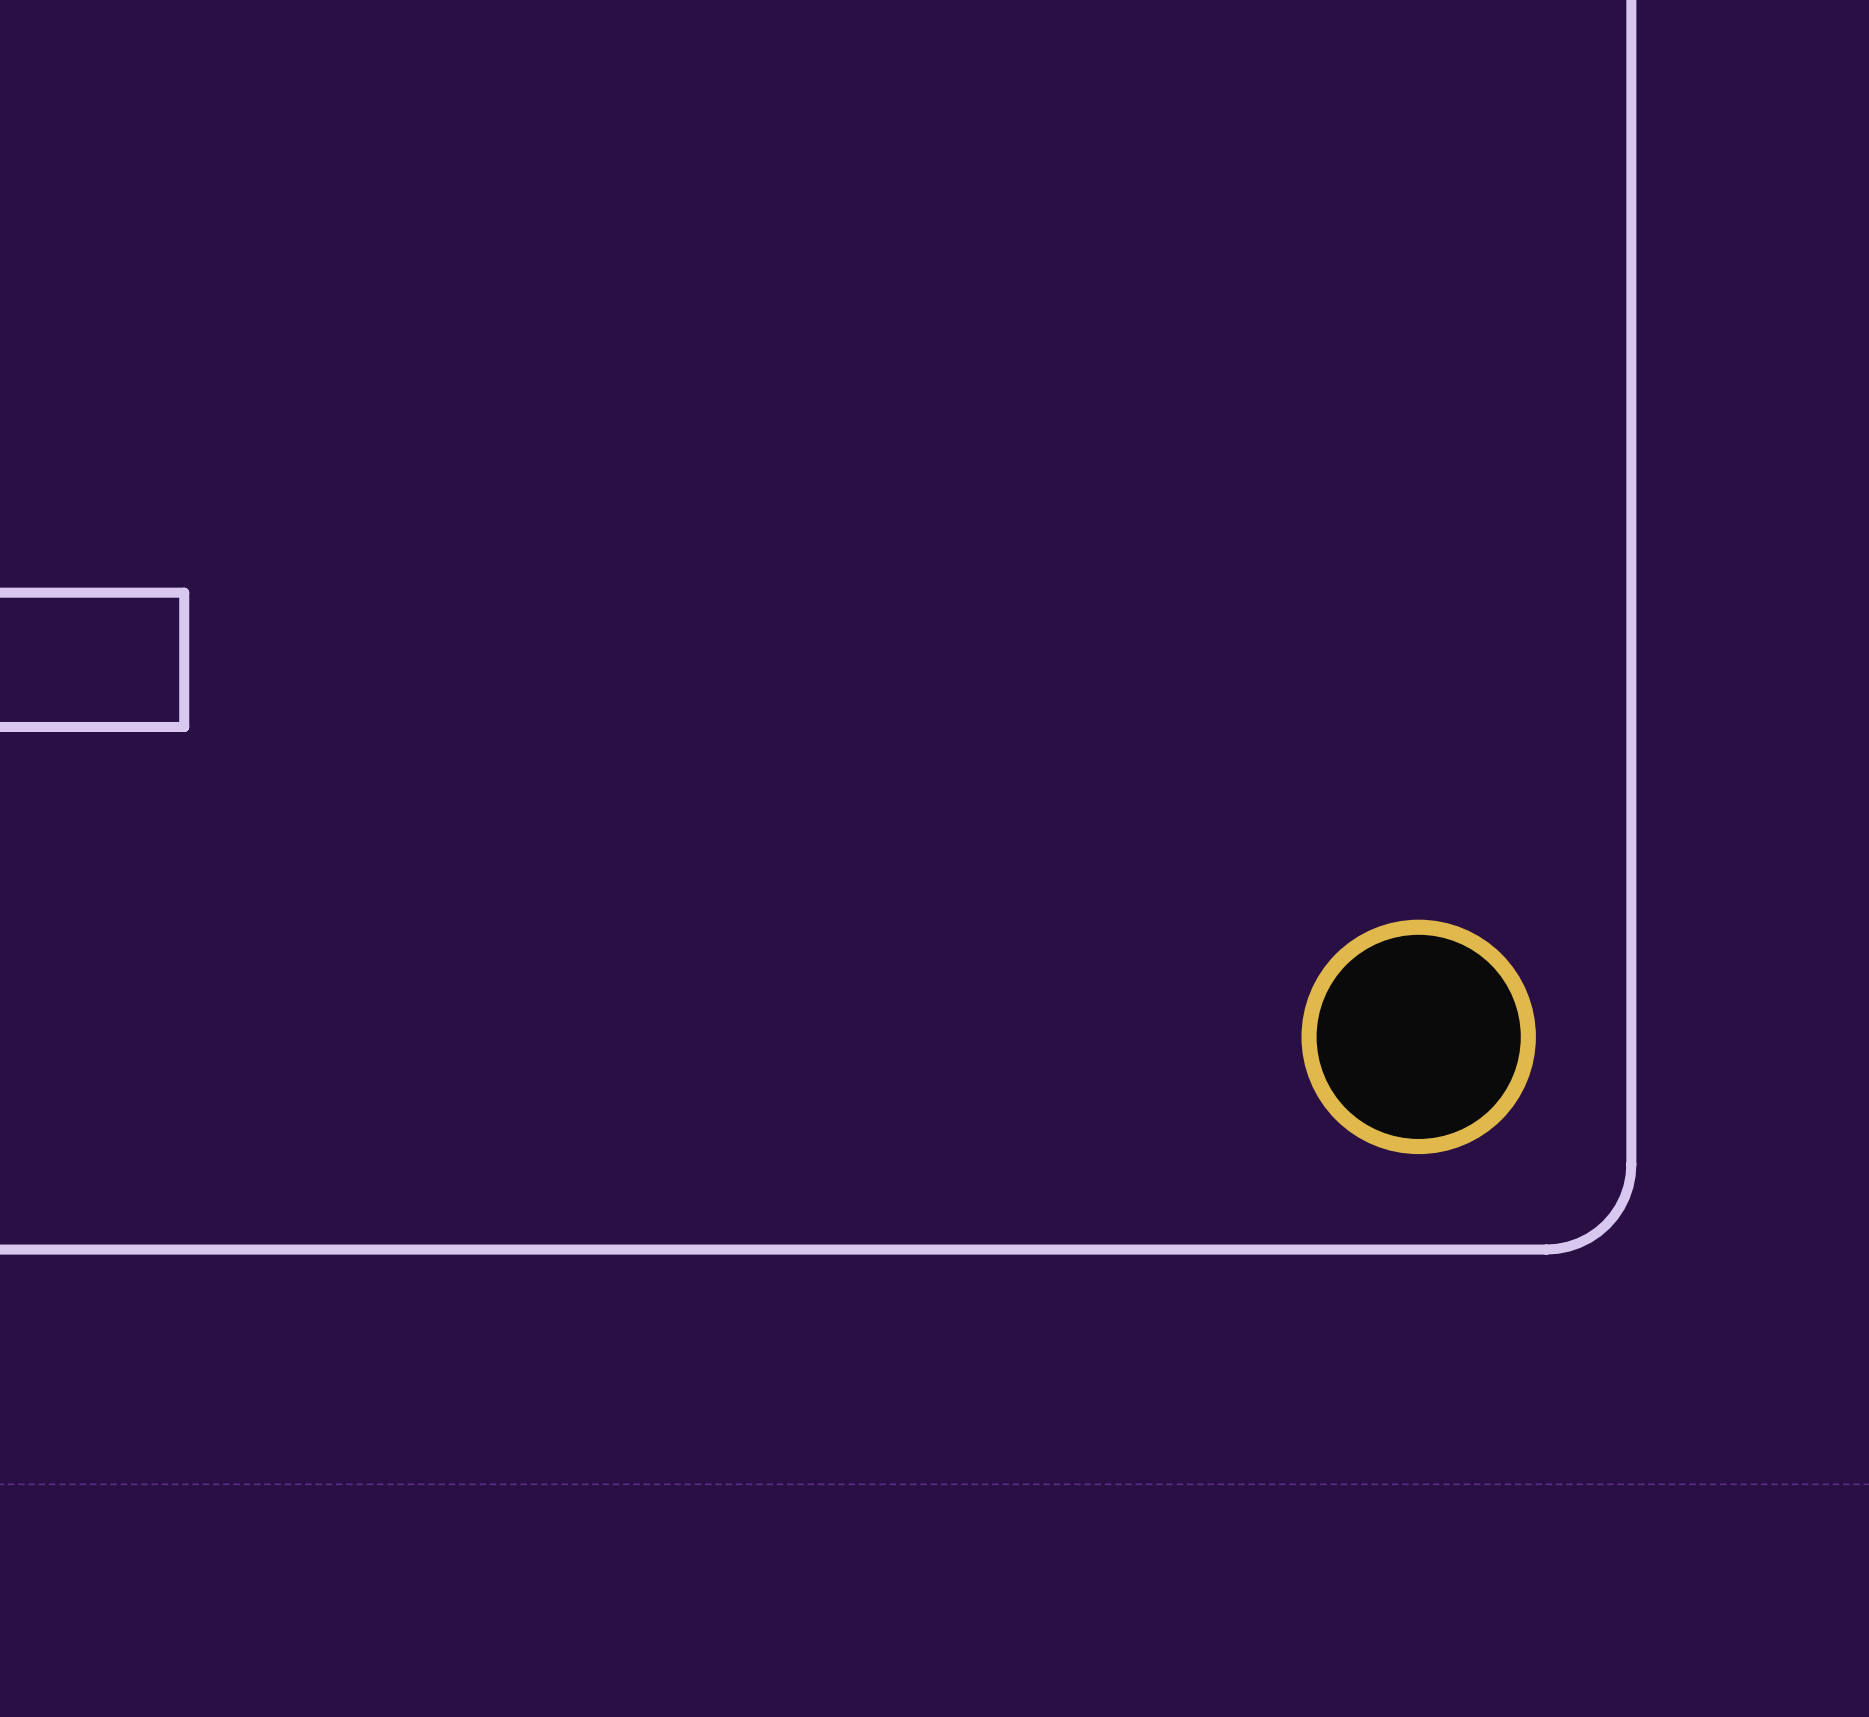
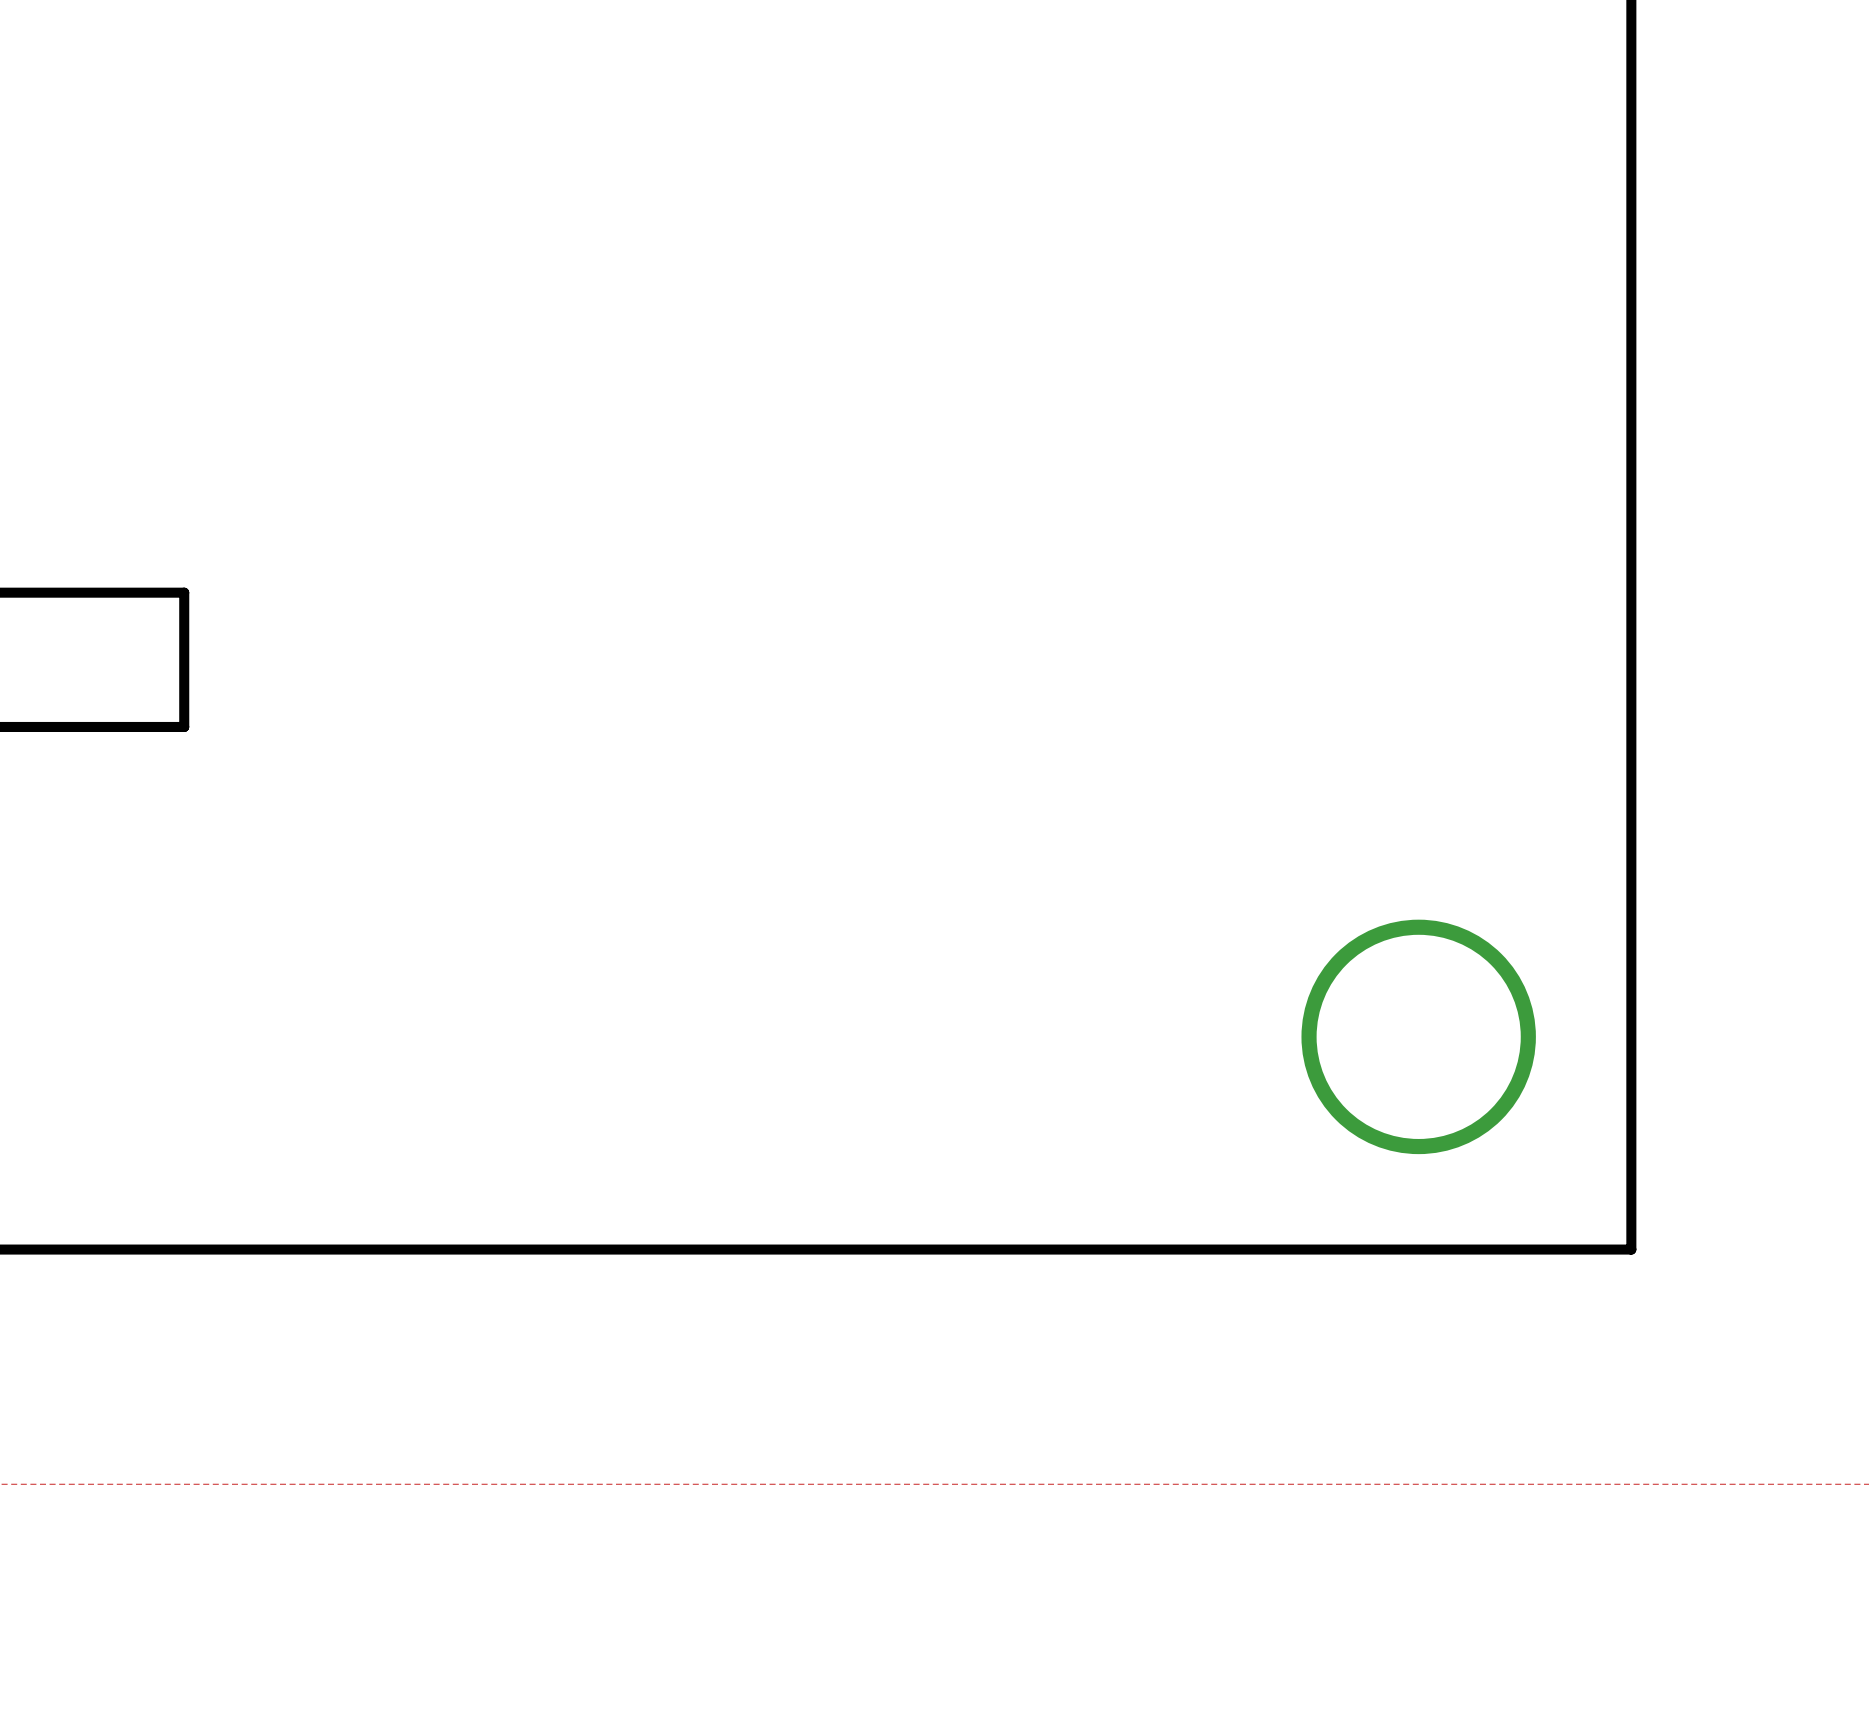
board edge: (1631, 1164) (1624, 1197) (1606, 1224) (1578, 1243) (1546, 1249) -> (1631, 1164) (1631, 1249) (1546, 1249)

